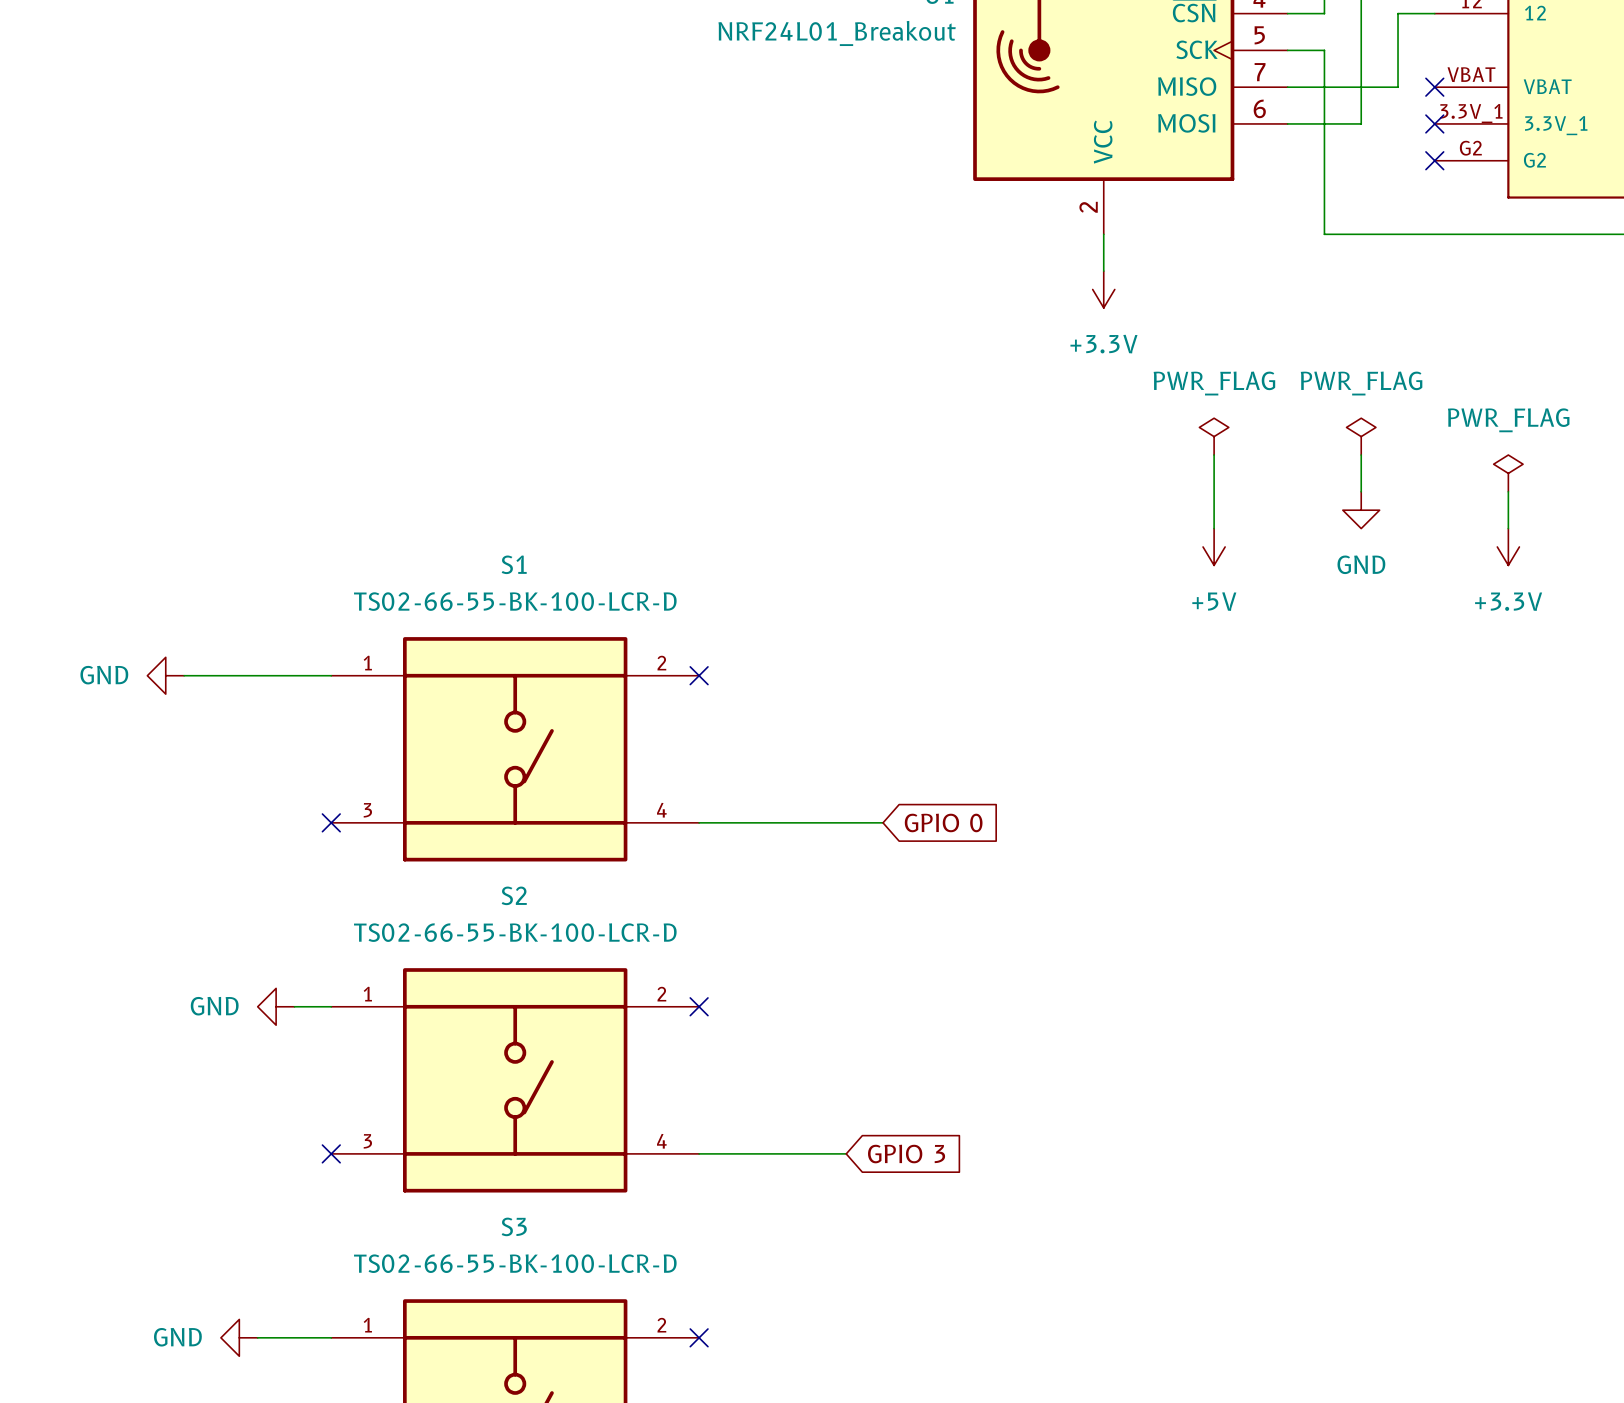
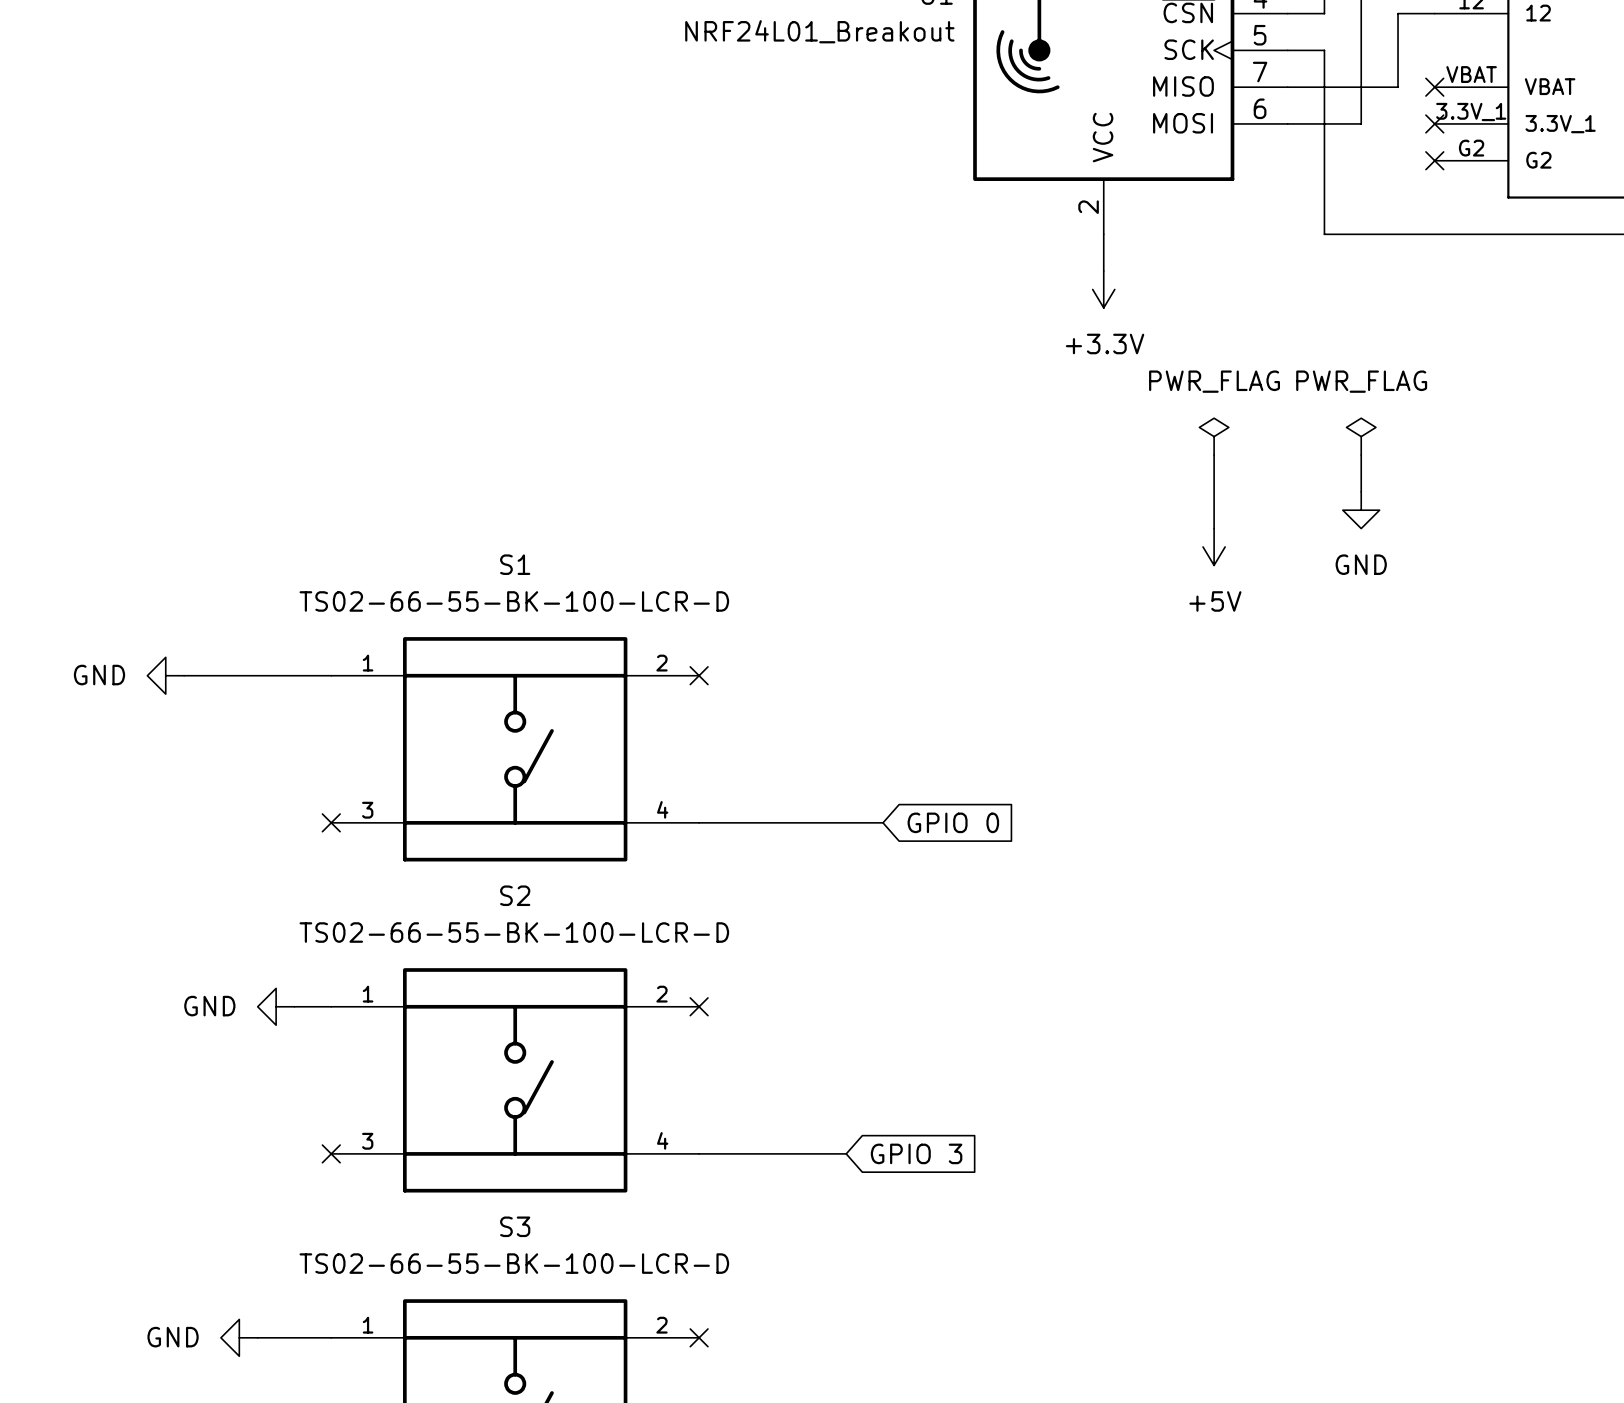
power symbol: PWR_FLAG (1508, 473) -> none
wire: (1508, 491) (1508, 528) -> none
power symbol: +3.3V (1508, 546) -> none

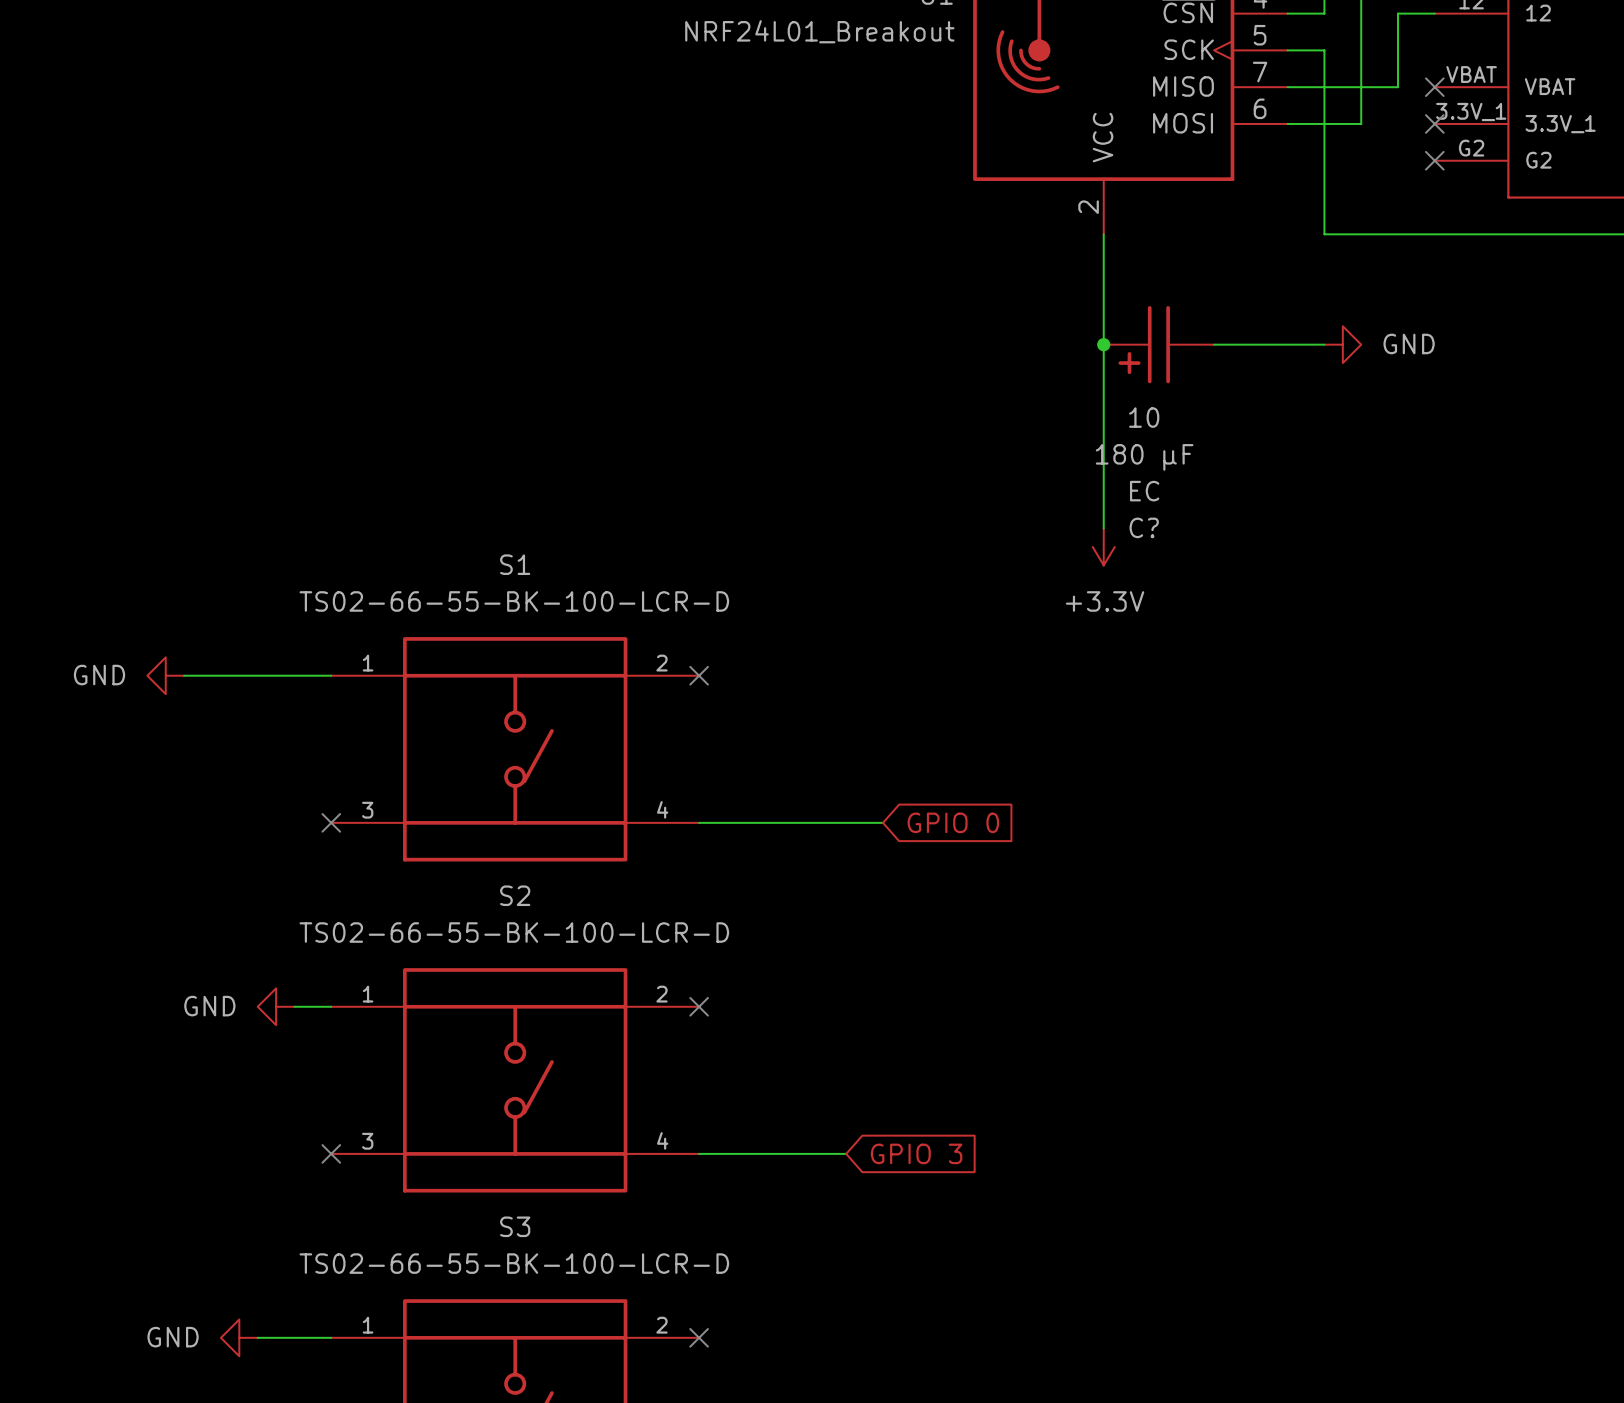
wire: none -> (1103, 271) (1103, 528)
power symbol position: +3.3V (1103, 289) -> +3.3V (1103, 546)
junction: none -> (1103, 344)
C?: none -> (1158, 344)
wire: none -> (1214, 344) (1324, 344)
power symbol: PWR_FLAG (1214, 436) -> none
power symbol: PWR_FLAG (1361, 436) -> none
wire: (1214, 455) (1214, 528) -> none
wire: (1361, 455) (1361, 491) -> none
power symbol rotation: 0° (1361, 510) -> 90° counterclockwise (1342, 344)
power symbol position: GND (1361, 510) -> GND (1342, 344)
power symbol: +5V (1214, 546) -> none

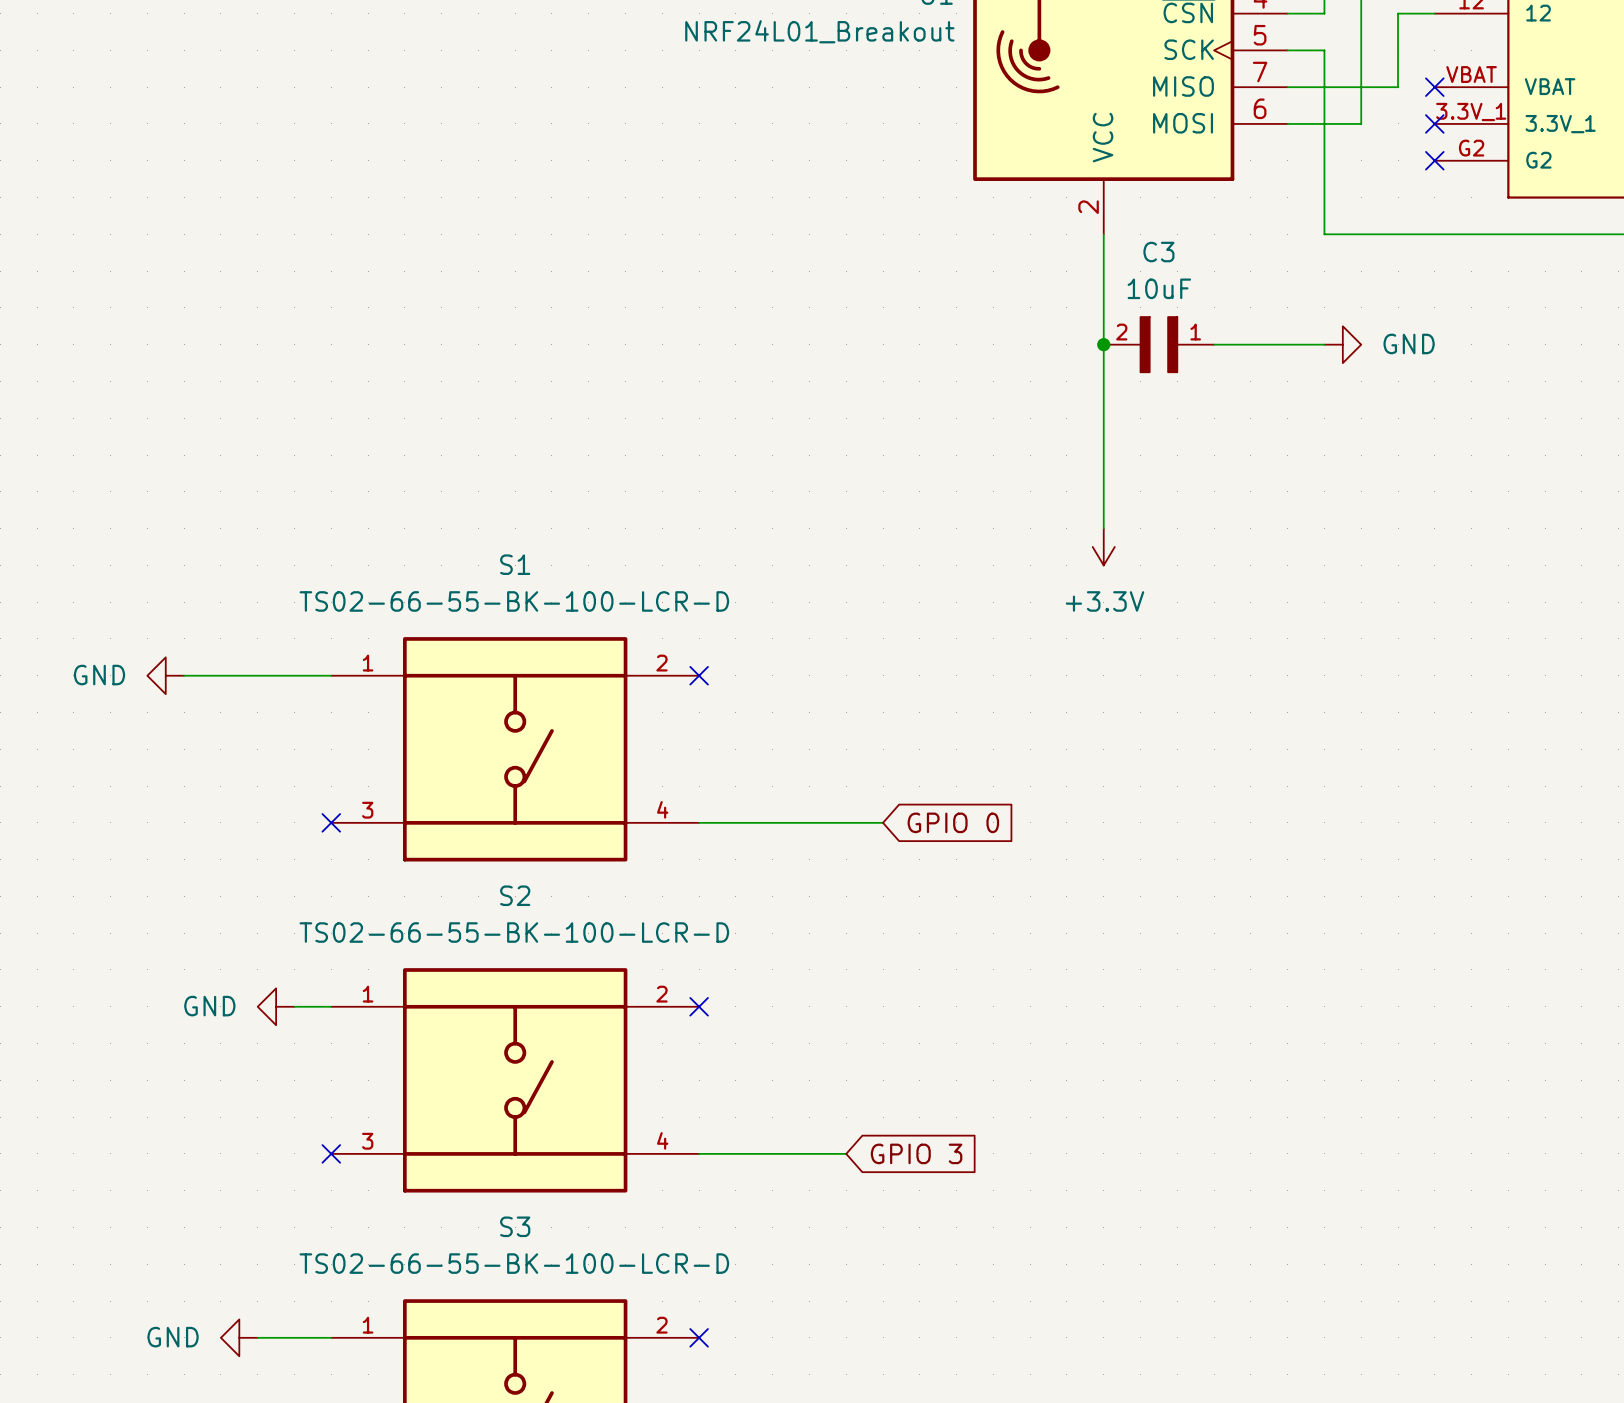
C?: (1158, 344) -> none
C3: none -> 10uF (1158, 344)

